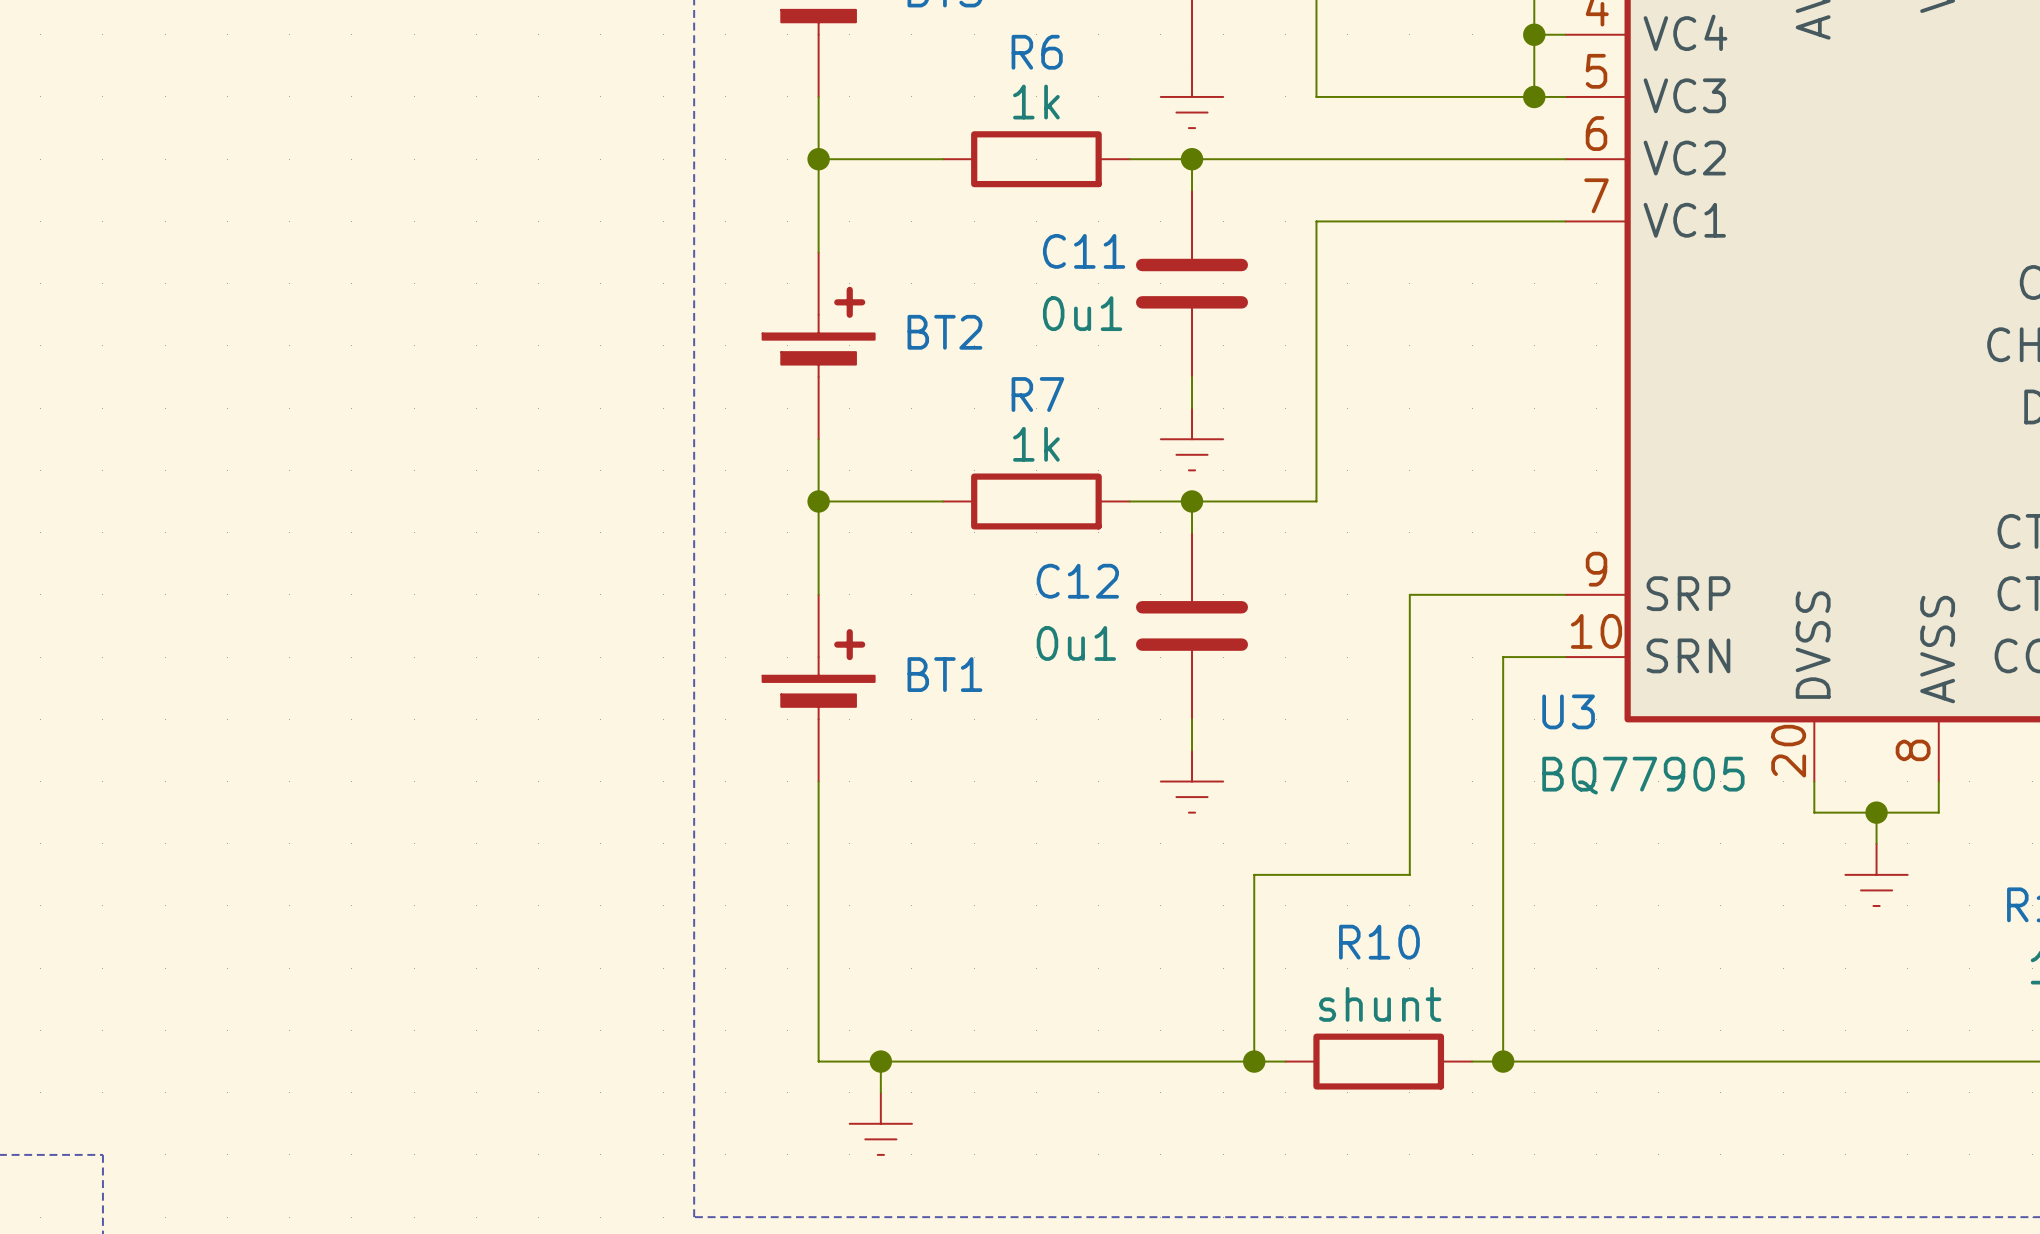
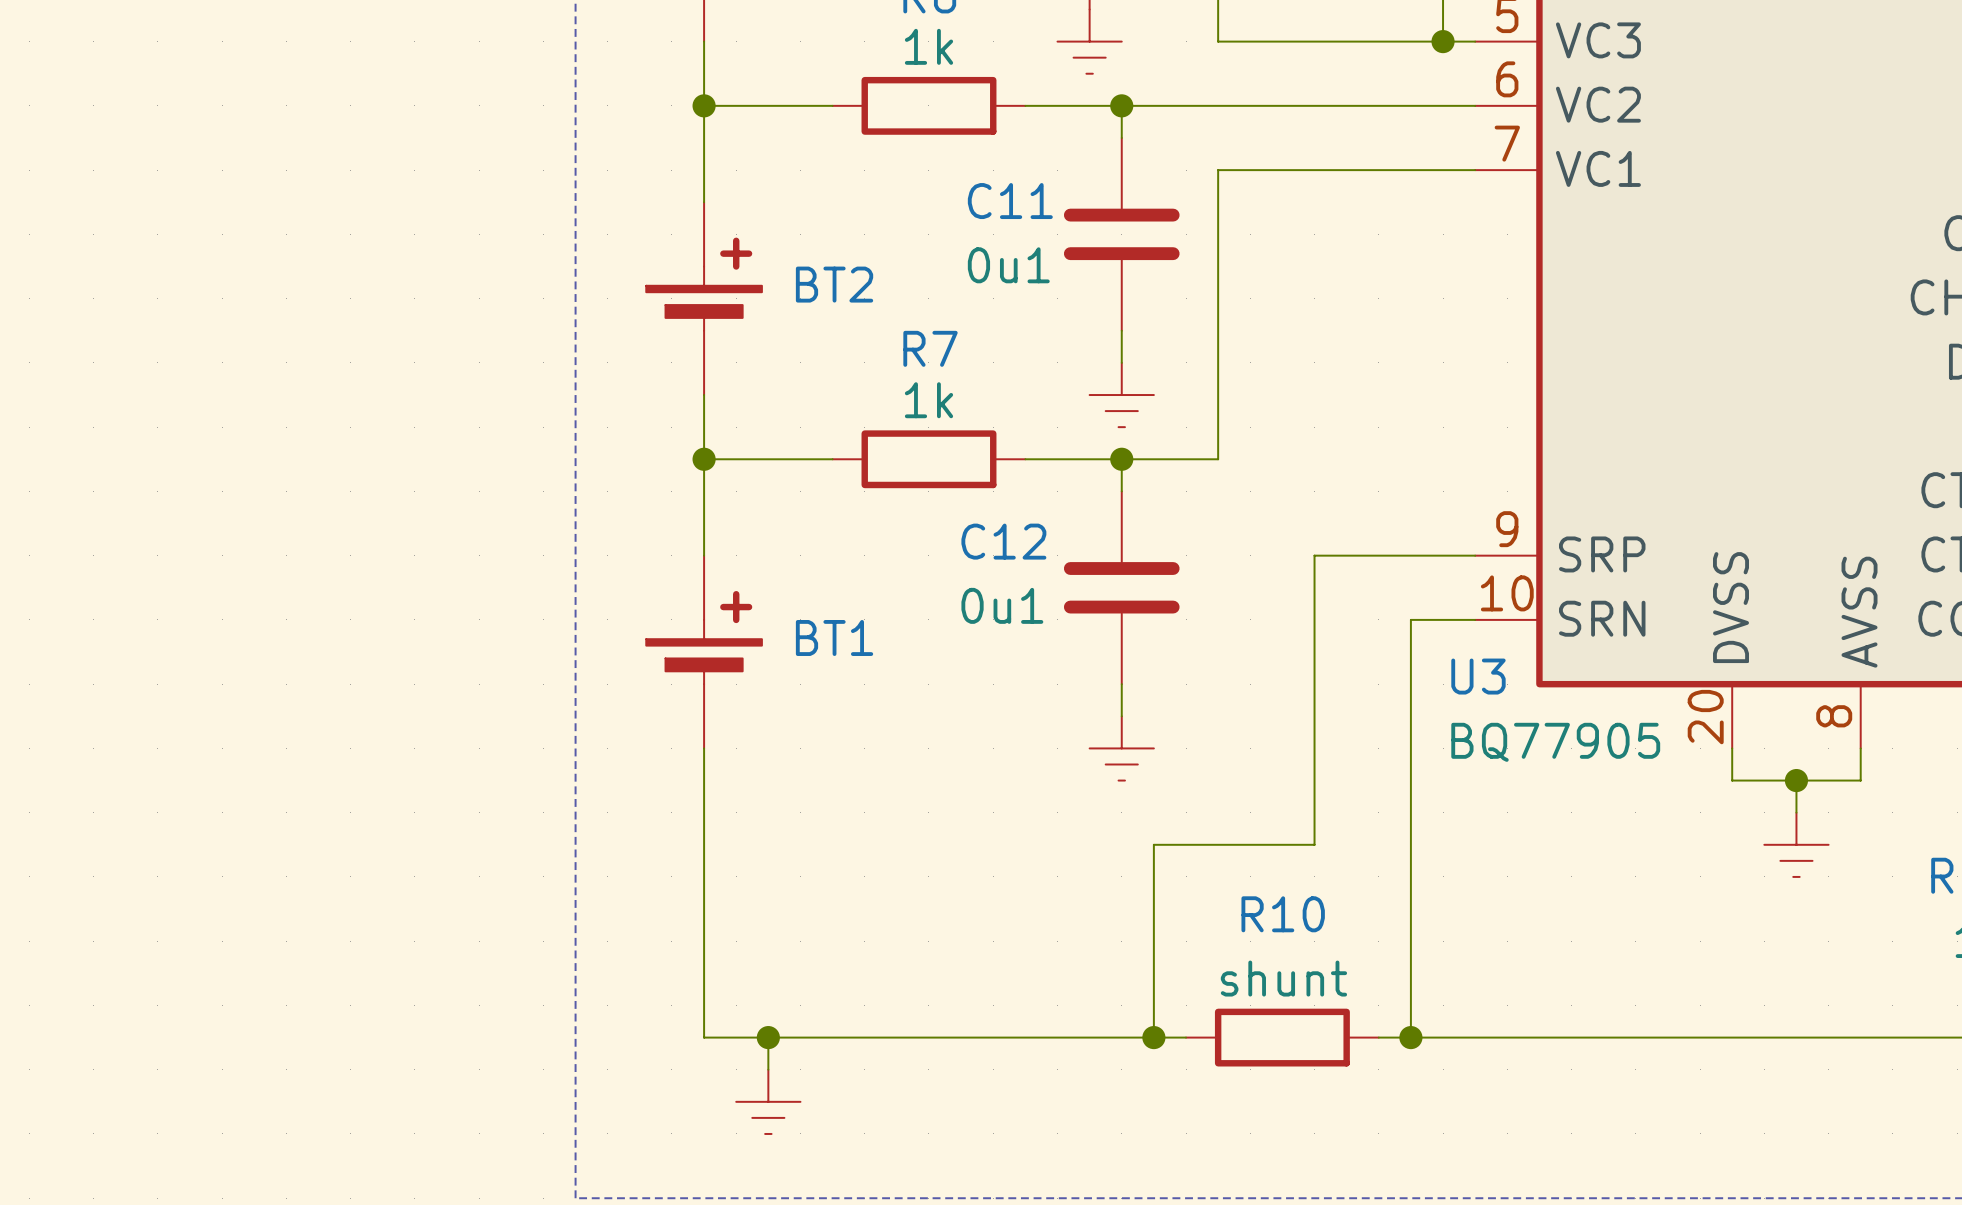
wire: (1192, 159) (1192, 190) -> (1121, 105) (1121, 137)
junction position: (1192, 159) -> (1121, 105)
C11 position: (1192, 283) -> (1121, 234)
wire: (1192, 377) (1192, 408) -> (1121, 330) (1121, 362)
power symbol position: (1192, 439) -> (1121, 395)
wire: (1192, 501) (1192, 532) -> (1121, 459) (1121, 491)
junction position: (1192, 501) -> (1121, 459)
C12 position: (1192, 625) -> (1121, 587)
wire: (1192, 719) (1192, 750) -> (1121, 684) (1121, 716)
power symbol position: (1192, 781) -> (1121, 748)

